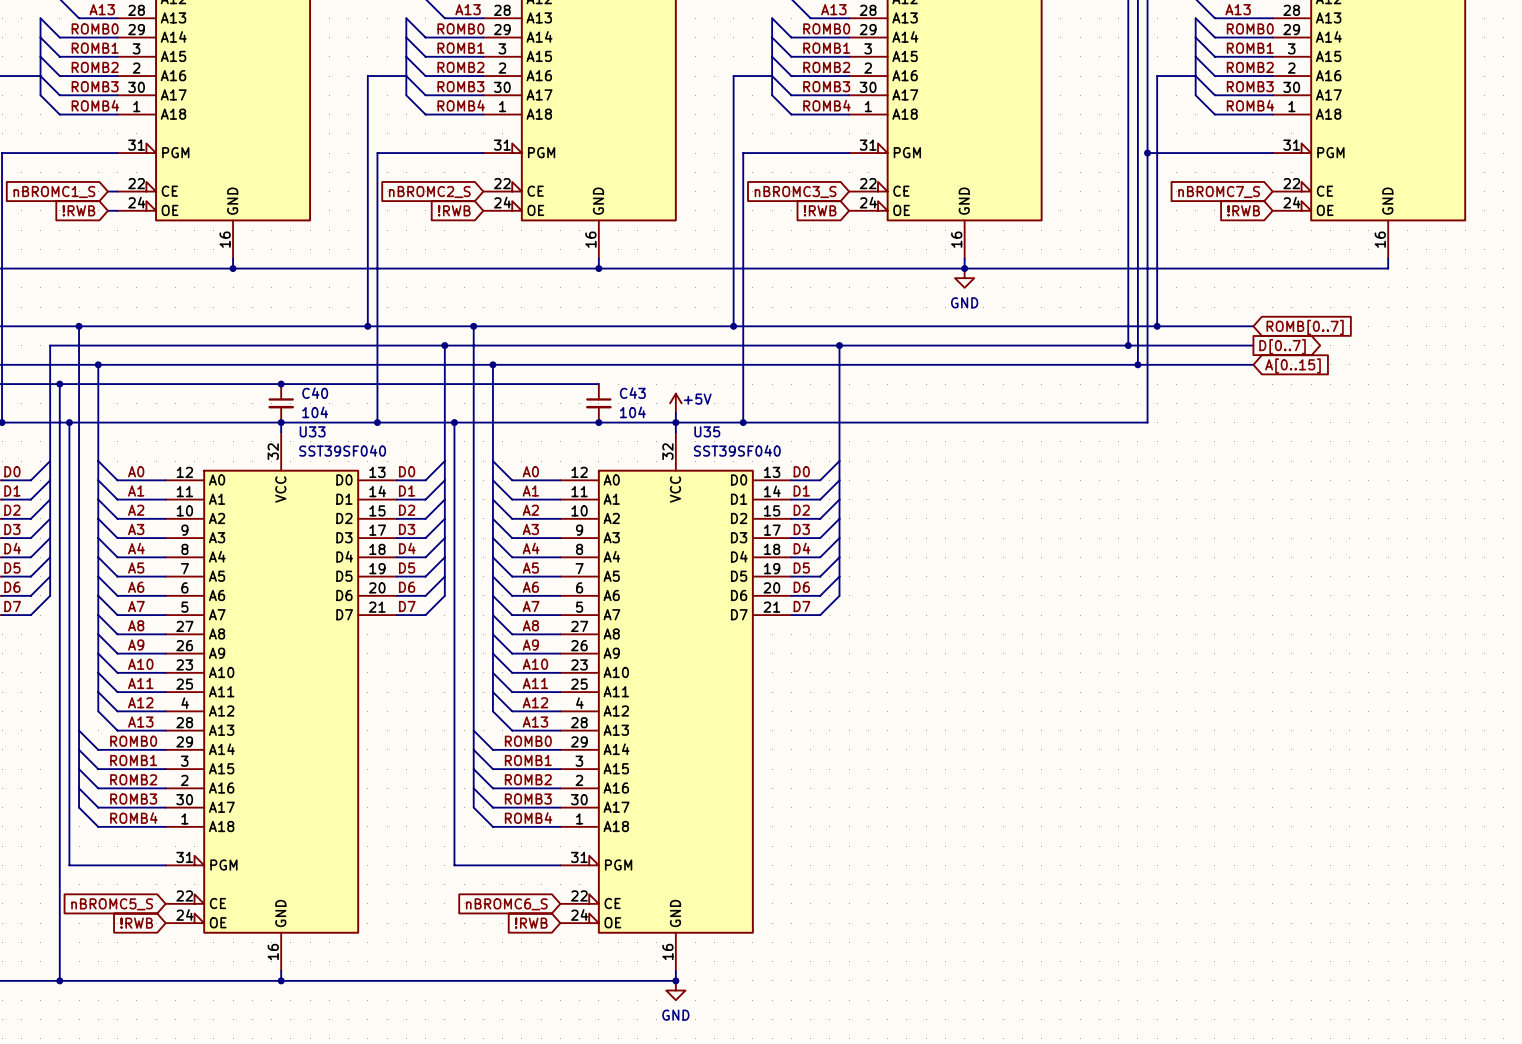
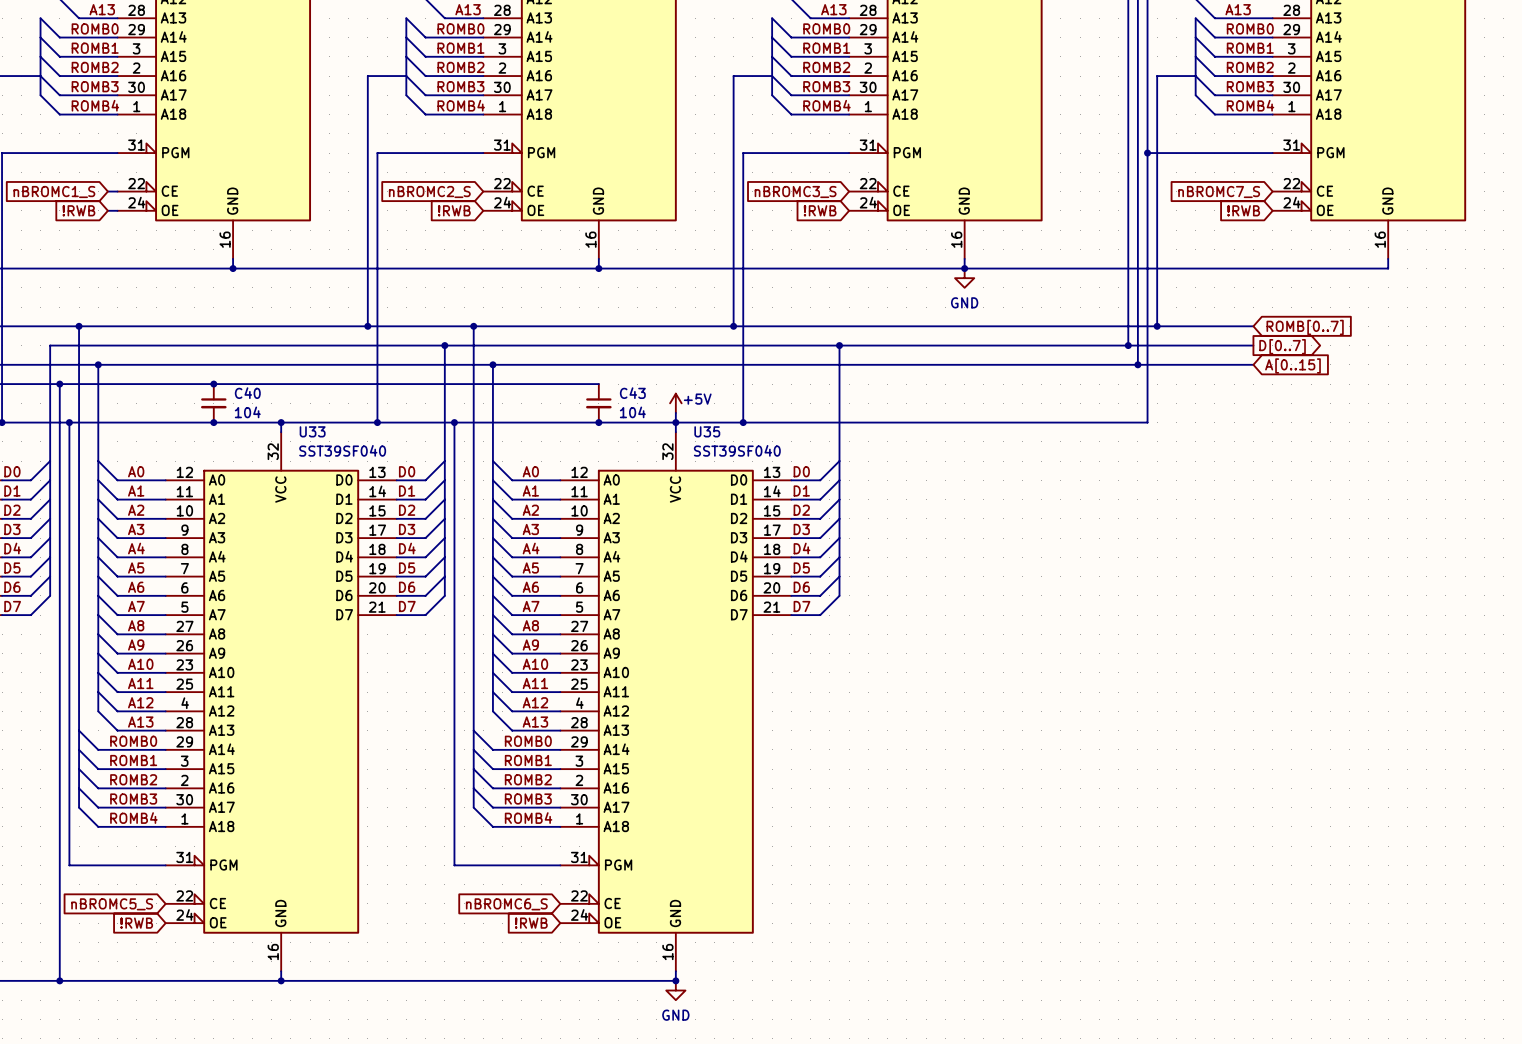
junction: none -> (213, 384)
junction: (281, 384) -> none
C40 position: (281, 403) -> (213, 403)
junction: none -> (213, 422)

